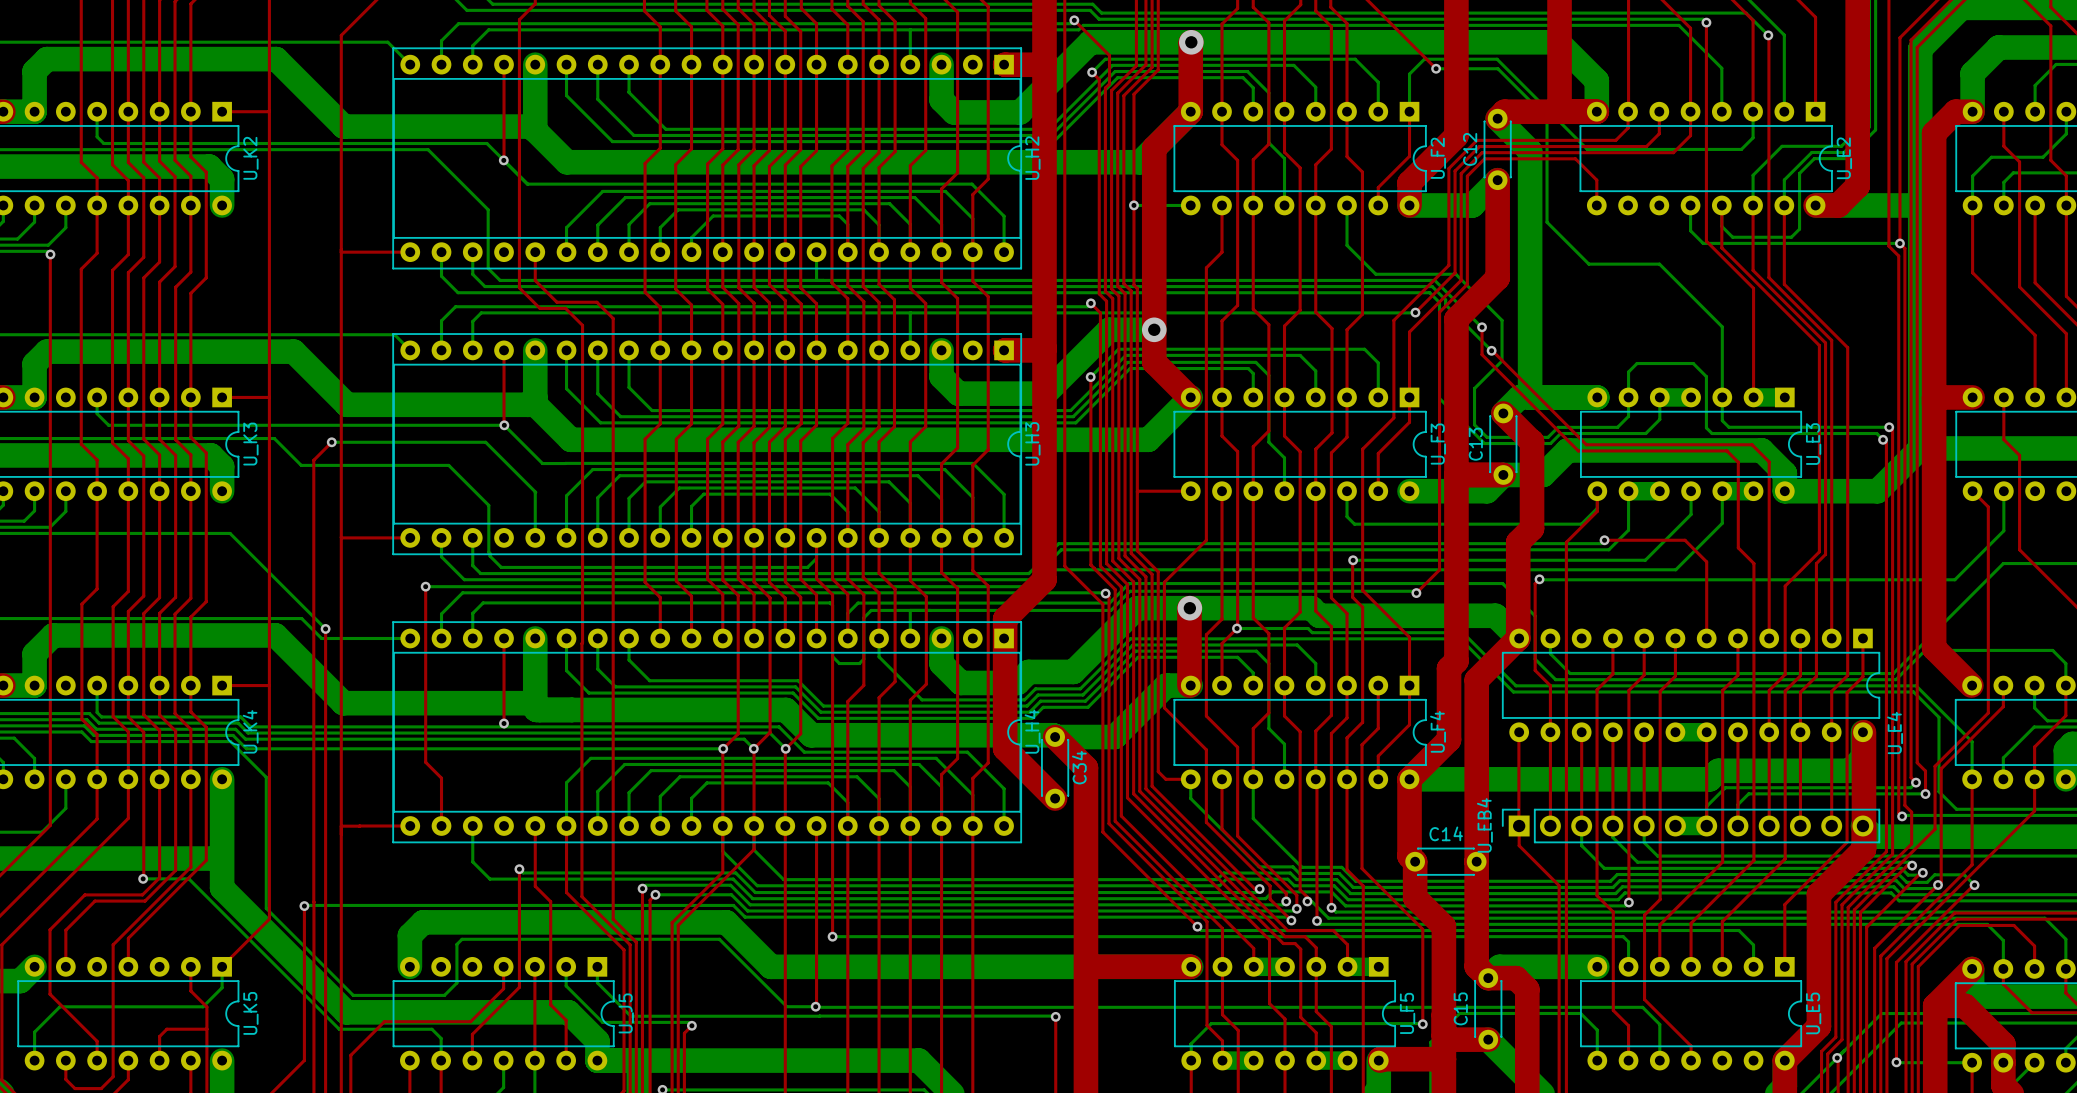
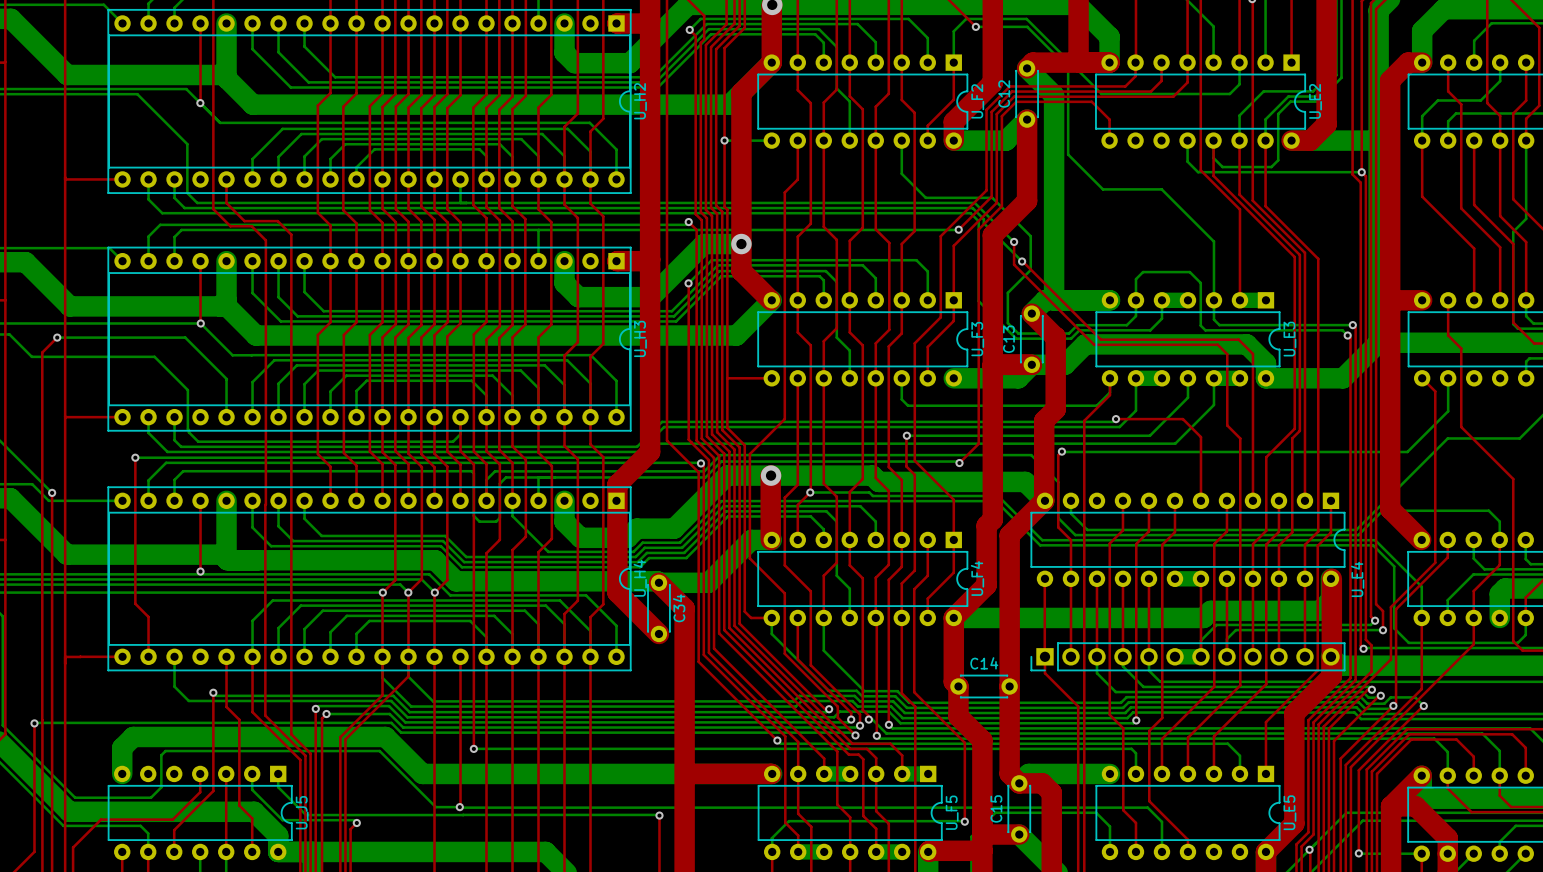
U_EB4: (1691, 826) -> none
part: none -> (1187, 656)

